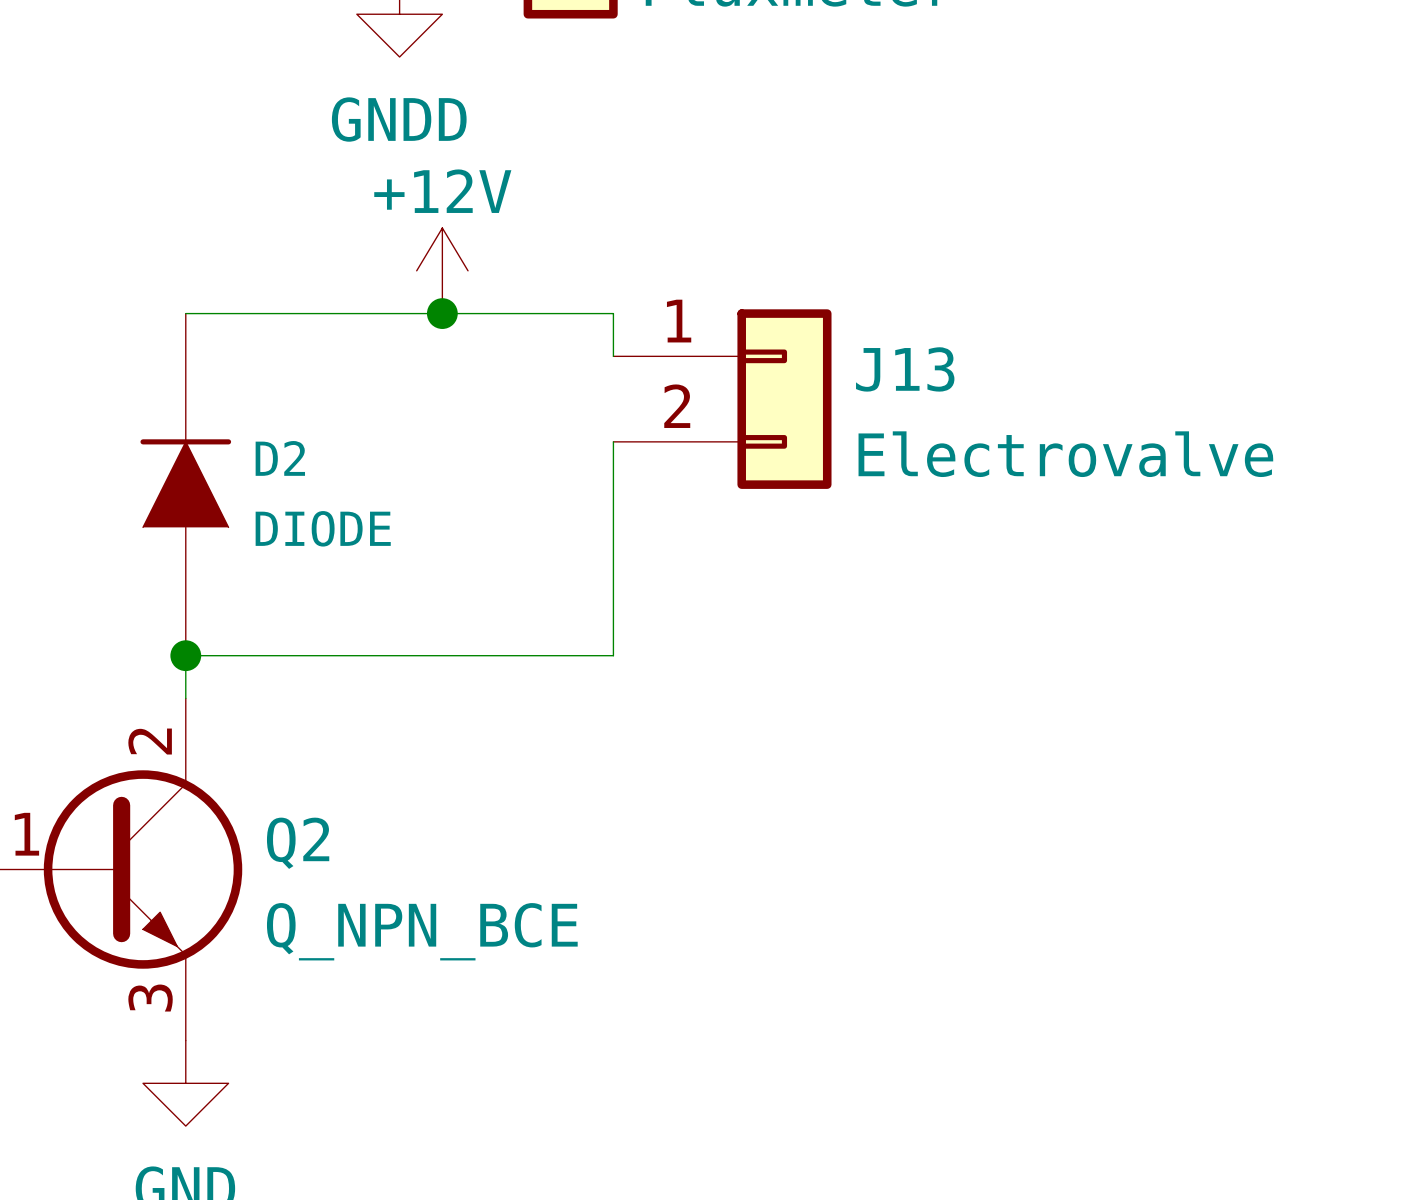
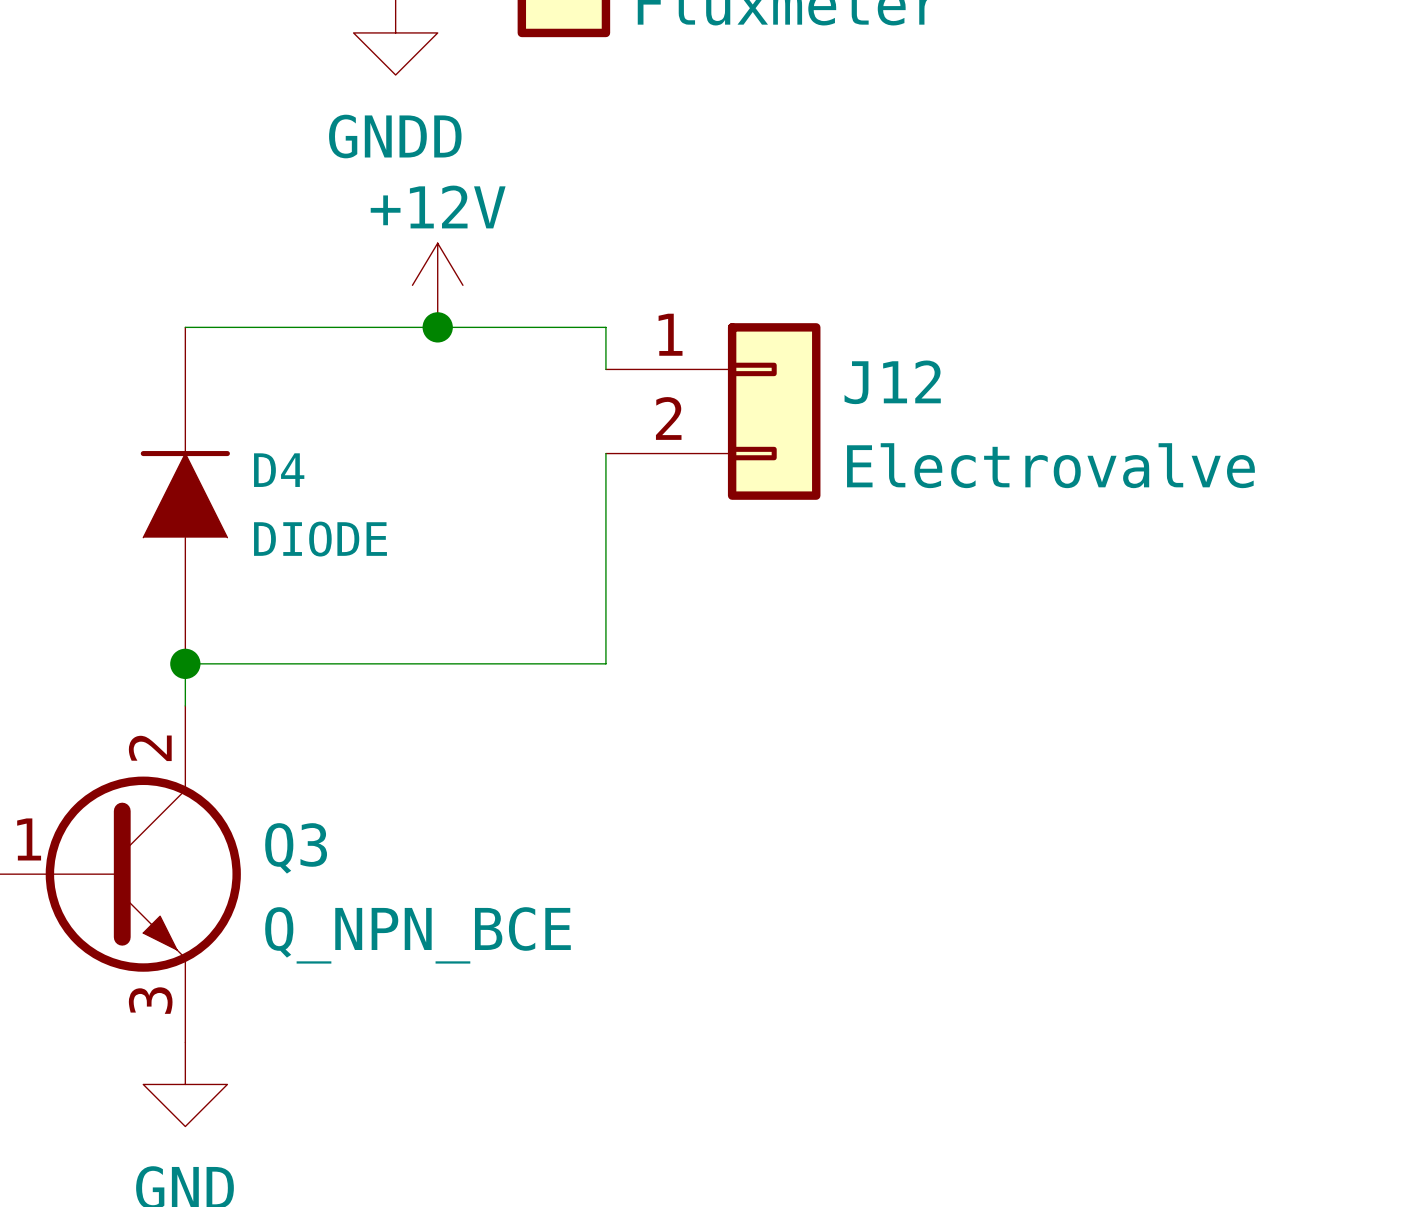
J13 name: J13 (905, 369) -> J12 (892, 382)
D2 name: D2 (280, 458) -> D4 (279, 470)
Q2 name: Q2 (298, 843) -> Q3 (296, 848)

